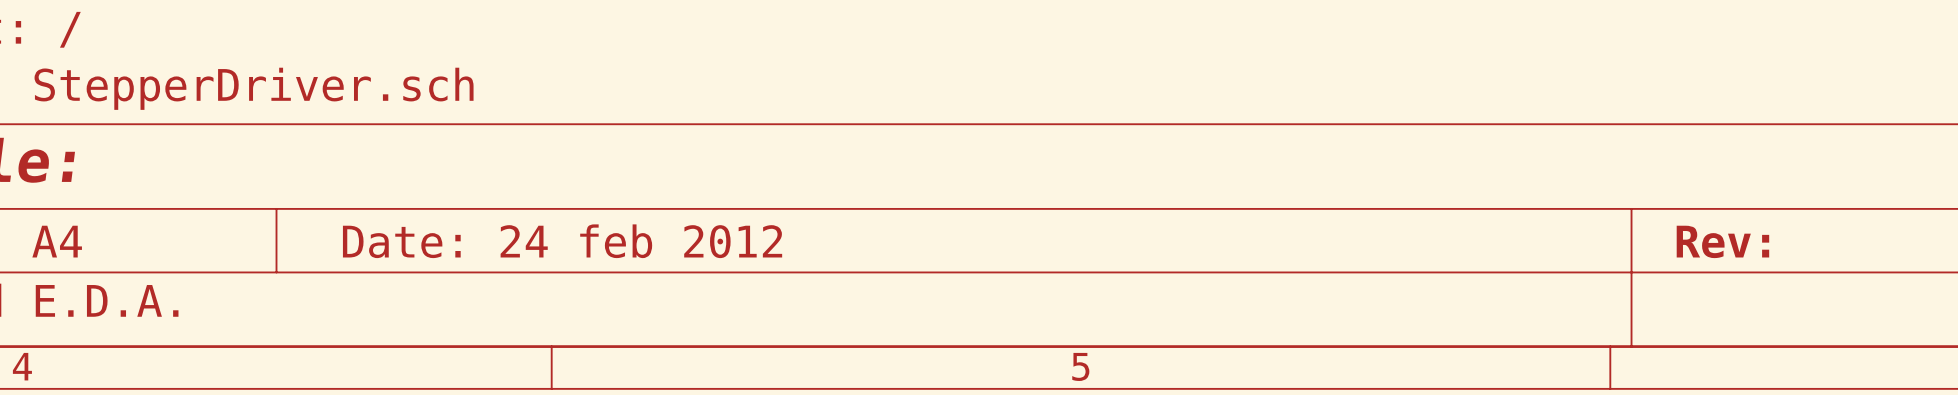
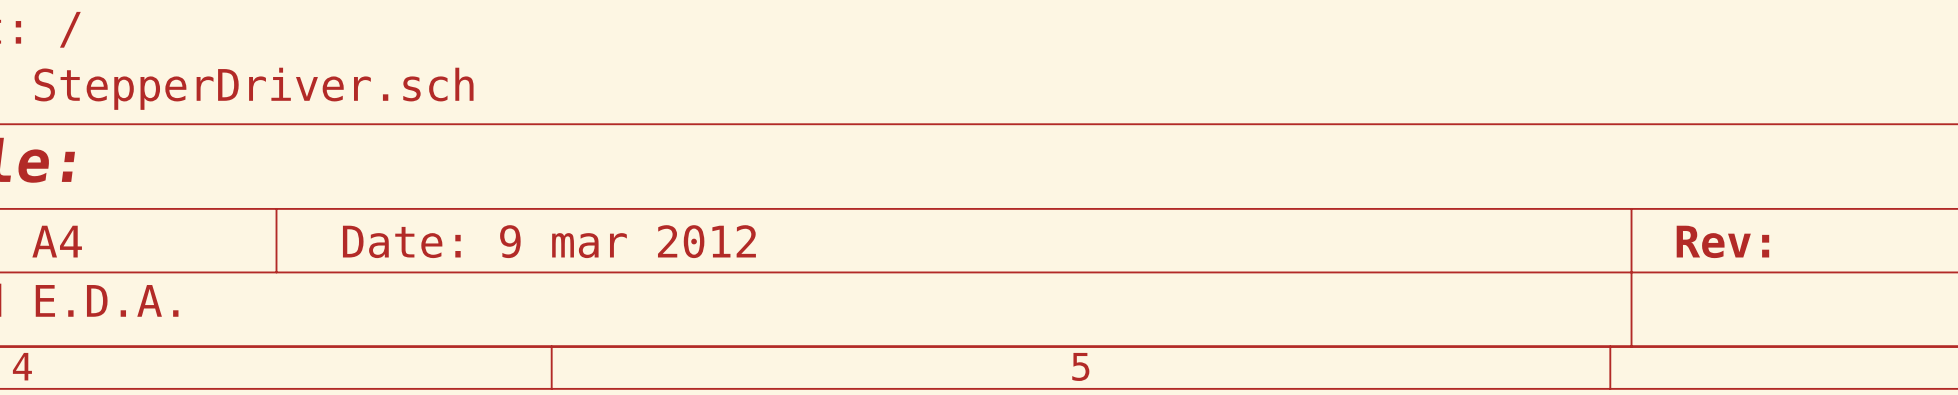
title block: Date: 24 feb 2012 (562, 241) -> Date: 9 mar 2012 (549, 241)

